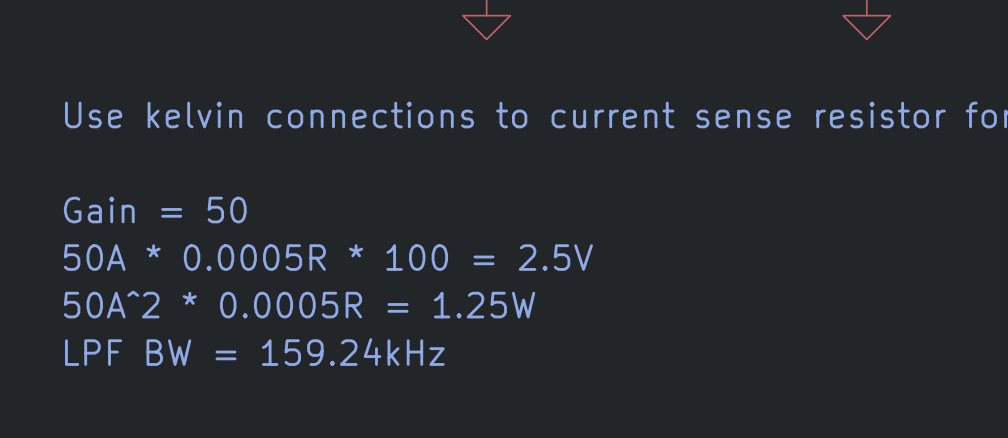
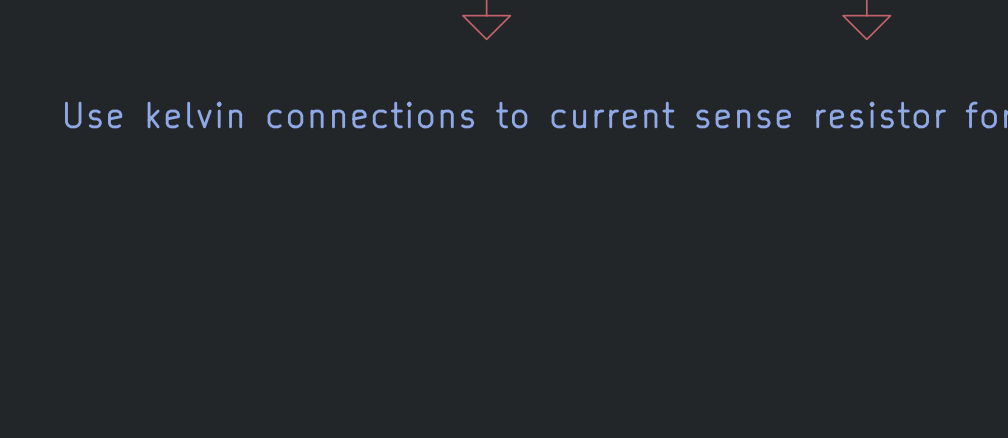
text: Gain = 50 (155, 210) -> none
text: 50A * 0.0005R * 100 = 2.5V (328, 257) -> none
text: 50A^2 * 0.0005R = 1.25W (299, 304) -> none
text: LPF BW = 159.24kHz (254, 352) -> none

